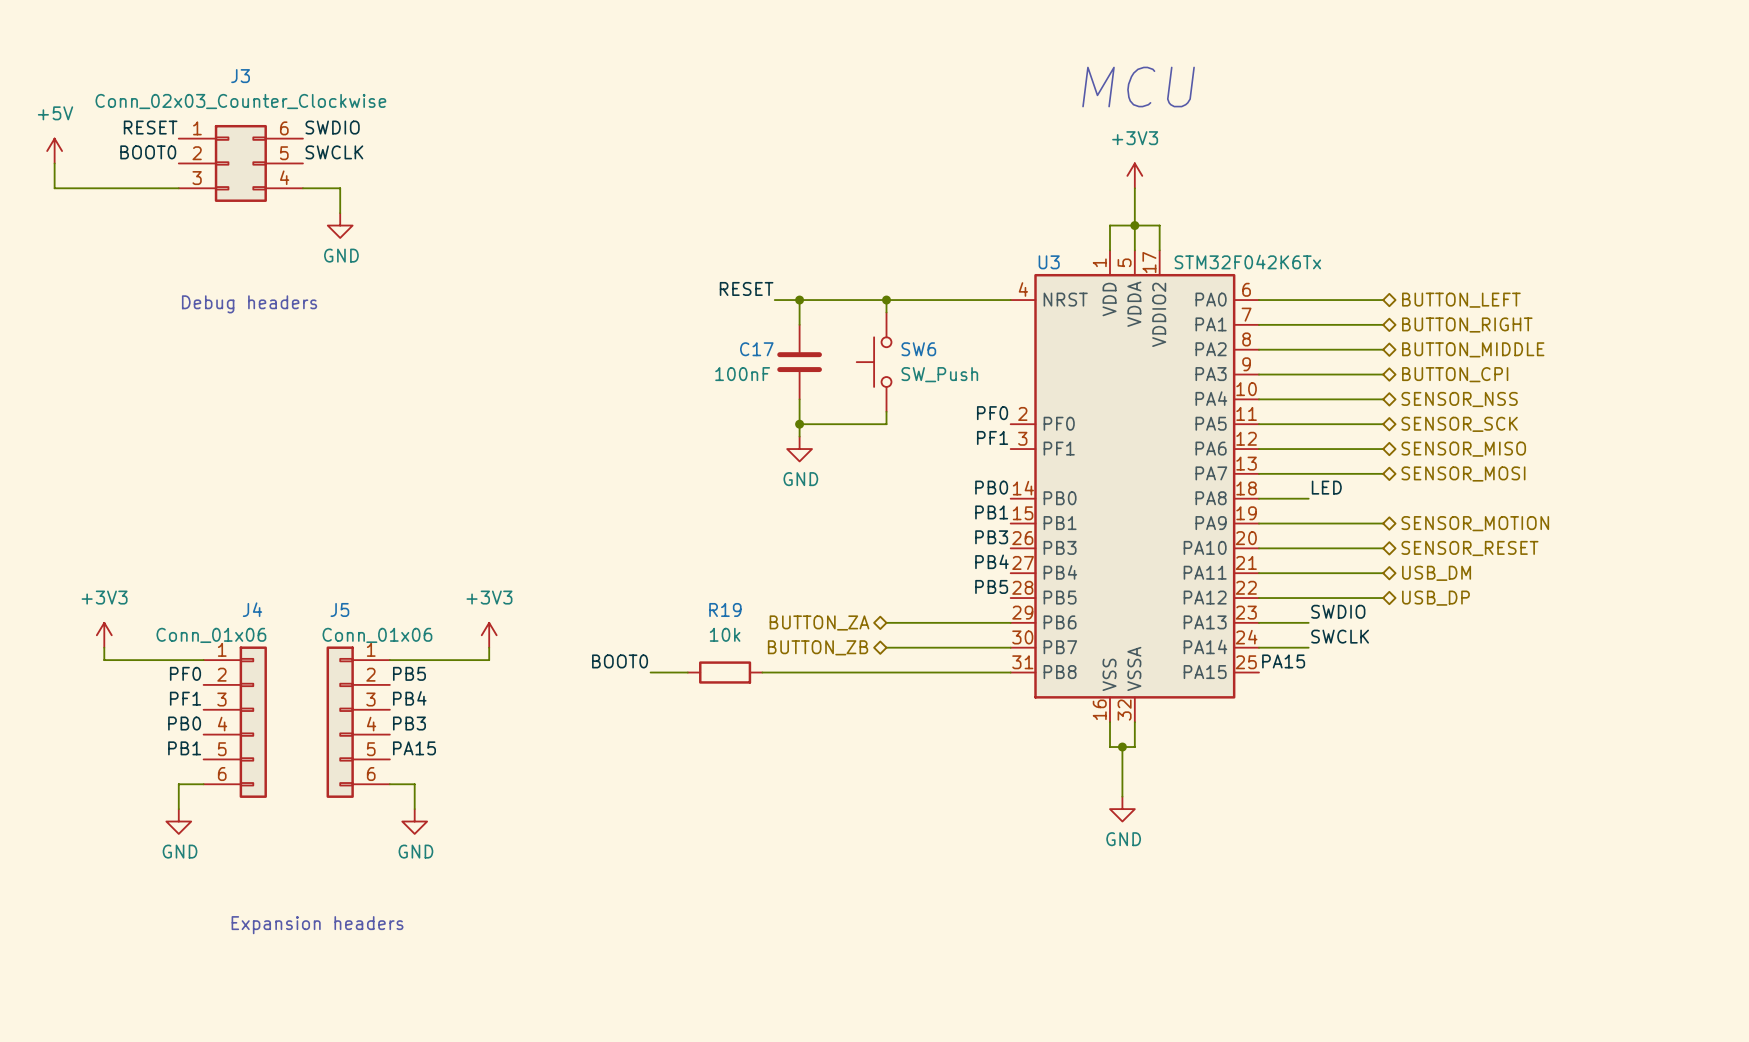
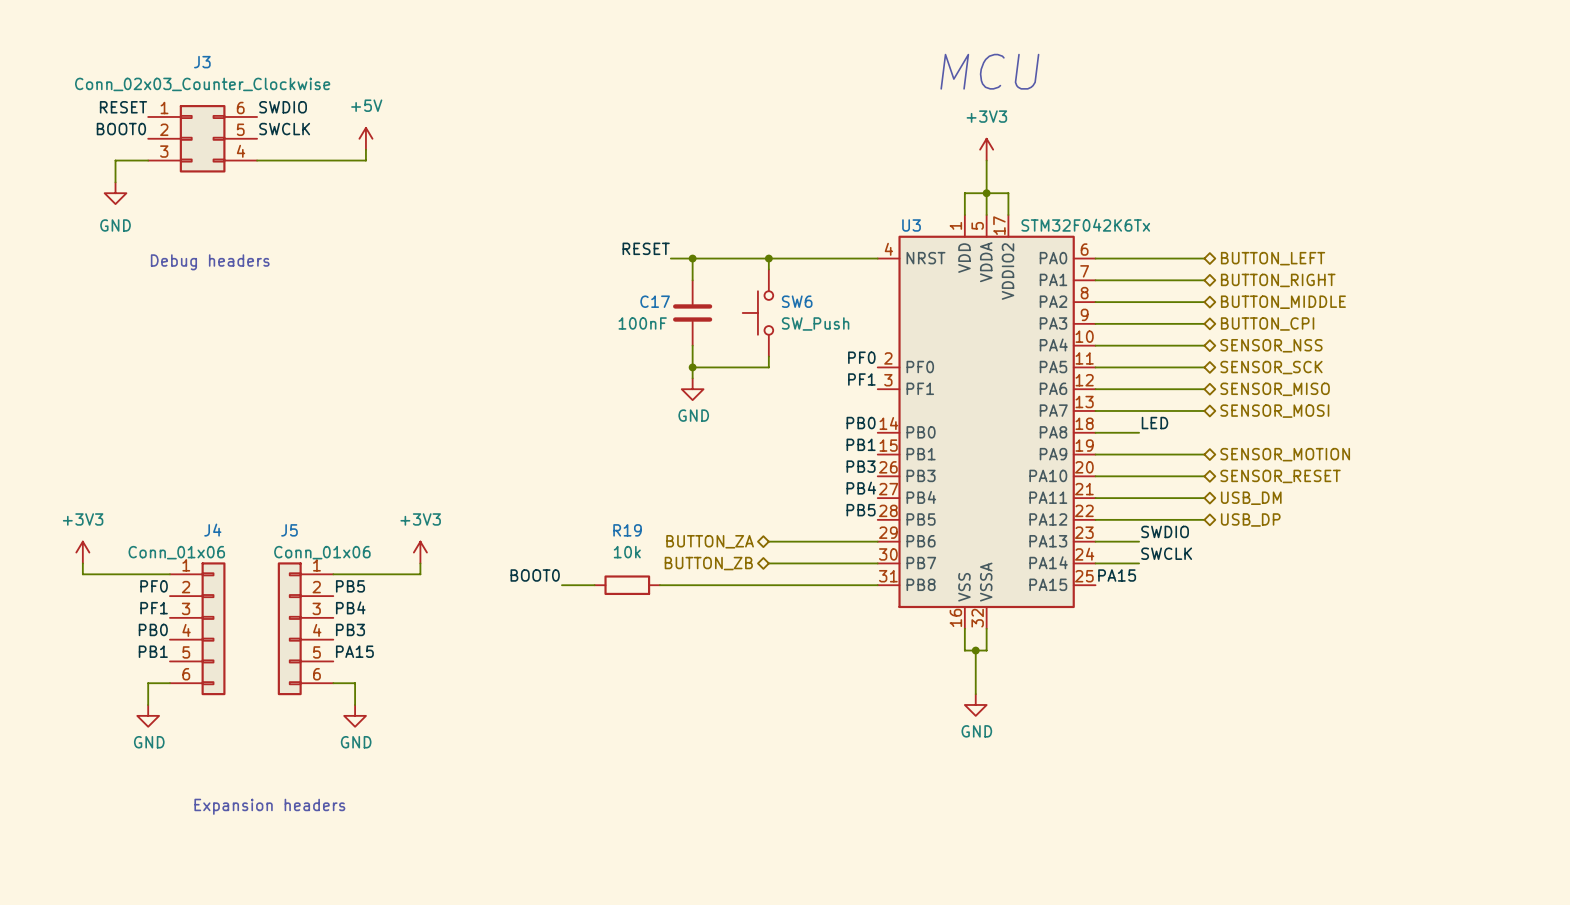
power symbol: +5V (54, 151) -> none
wire: (54, 163) (54, 188) (141, 188) -> (115, 182) (115, 160)
power symbol: none -> +5V (365, 138)
wire: (340, 188) (340, 213) -> (289, 160) (365, 160) (365, 149)
power symbol position: GND (340, 225) -> GND (115, 193)
power symbol text position: GND (341, 255) -> GND (115, 225)

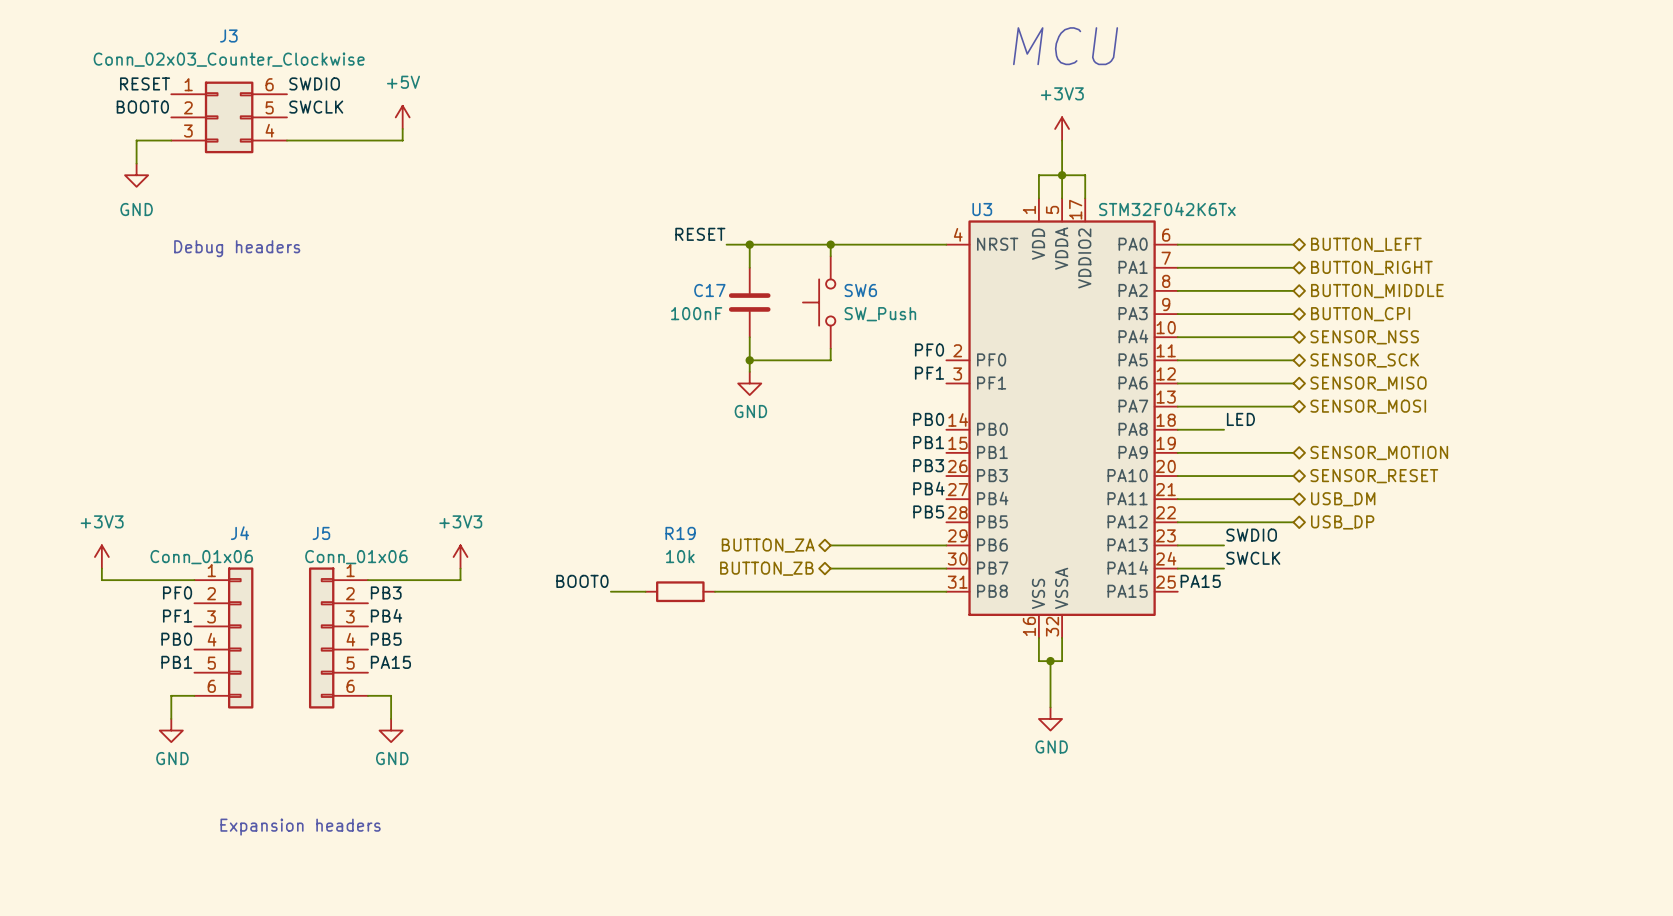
label: PB5 (350, 586) -> PB3 (386, 592)
label: PB3 (350, 629) -> PB5 (386, 639)

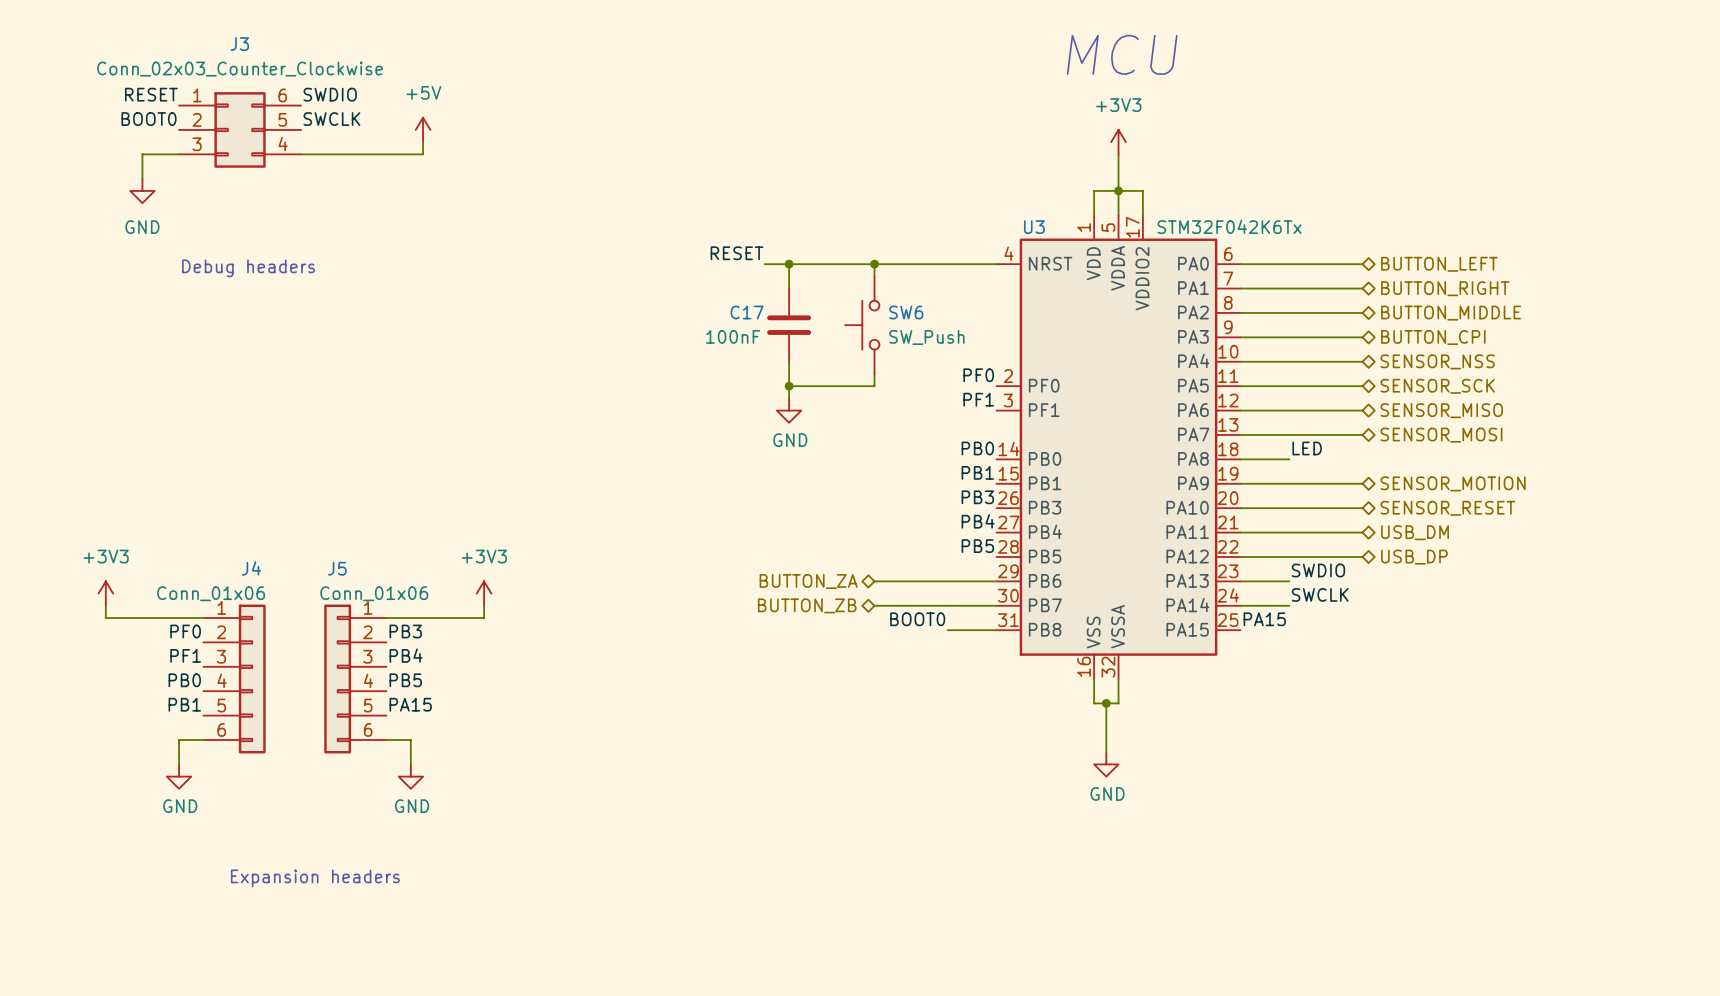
label: BOOT0 (582, 581) -> none
label: none -> BOOT0 (917, 619)
wire: (610, 591) (645, 591) -> none
R19: 10k (680, 591) -> none
wire: (715, 591) (900, 591) -> none

